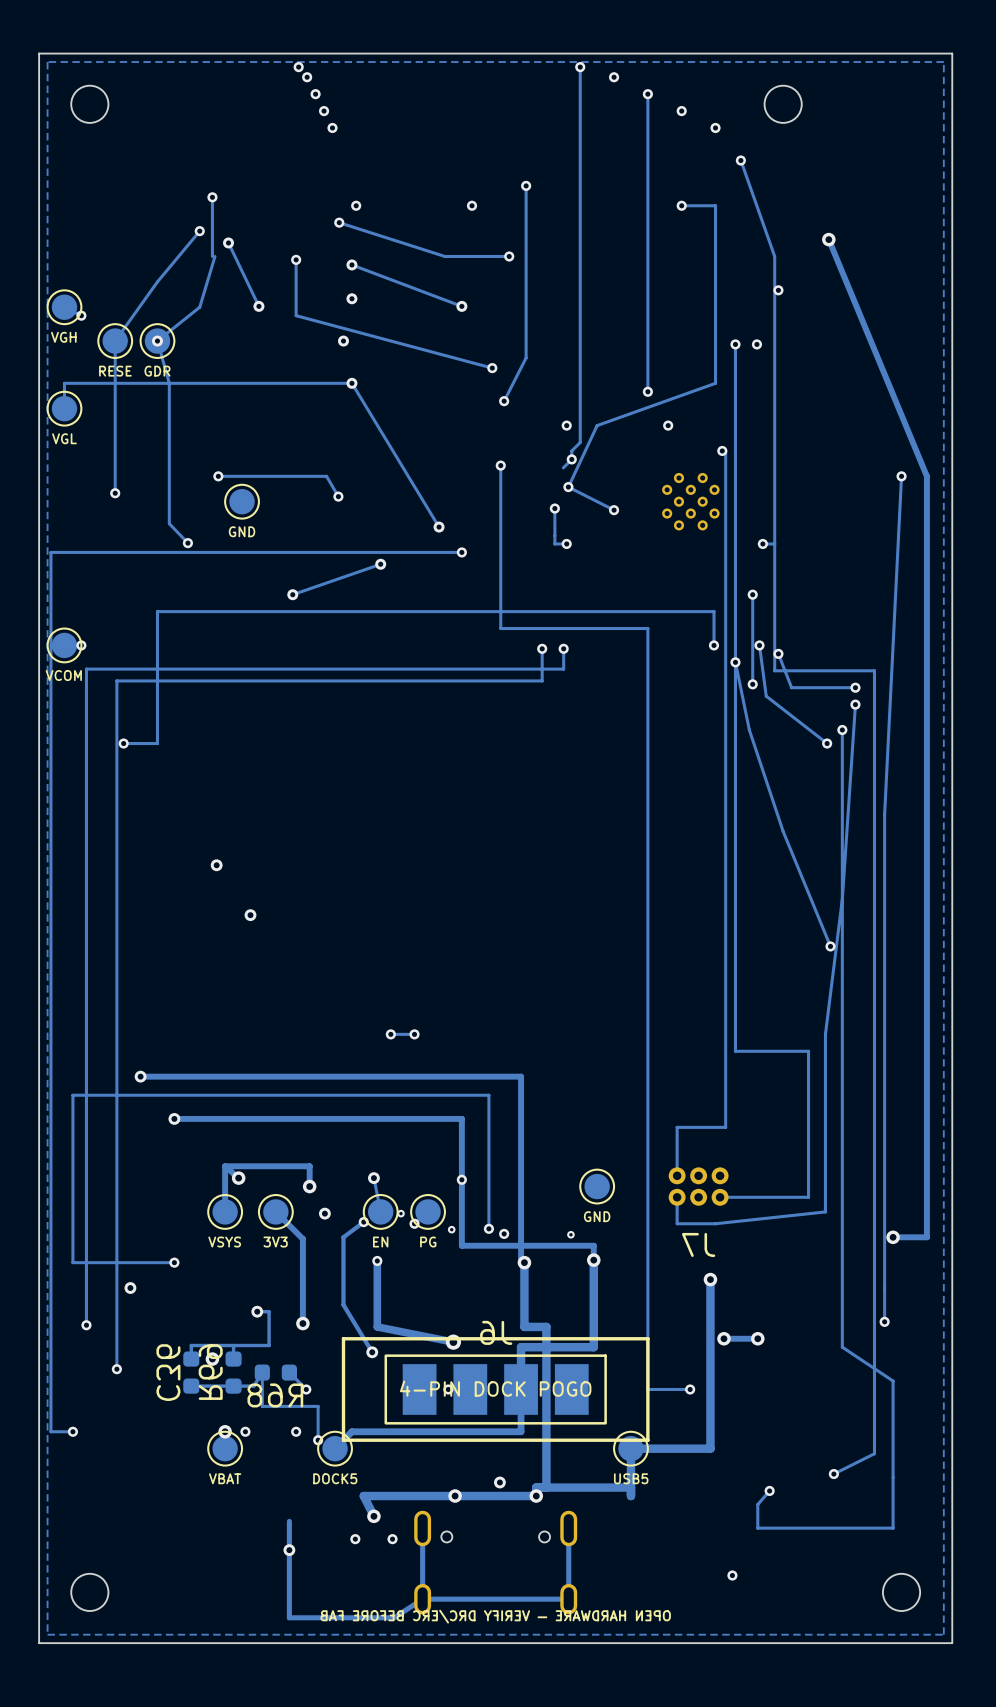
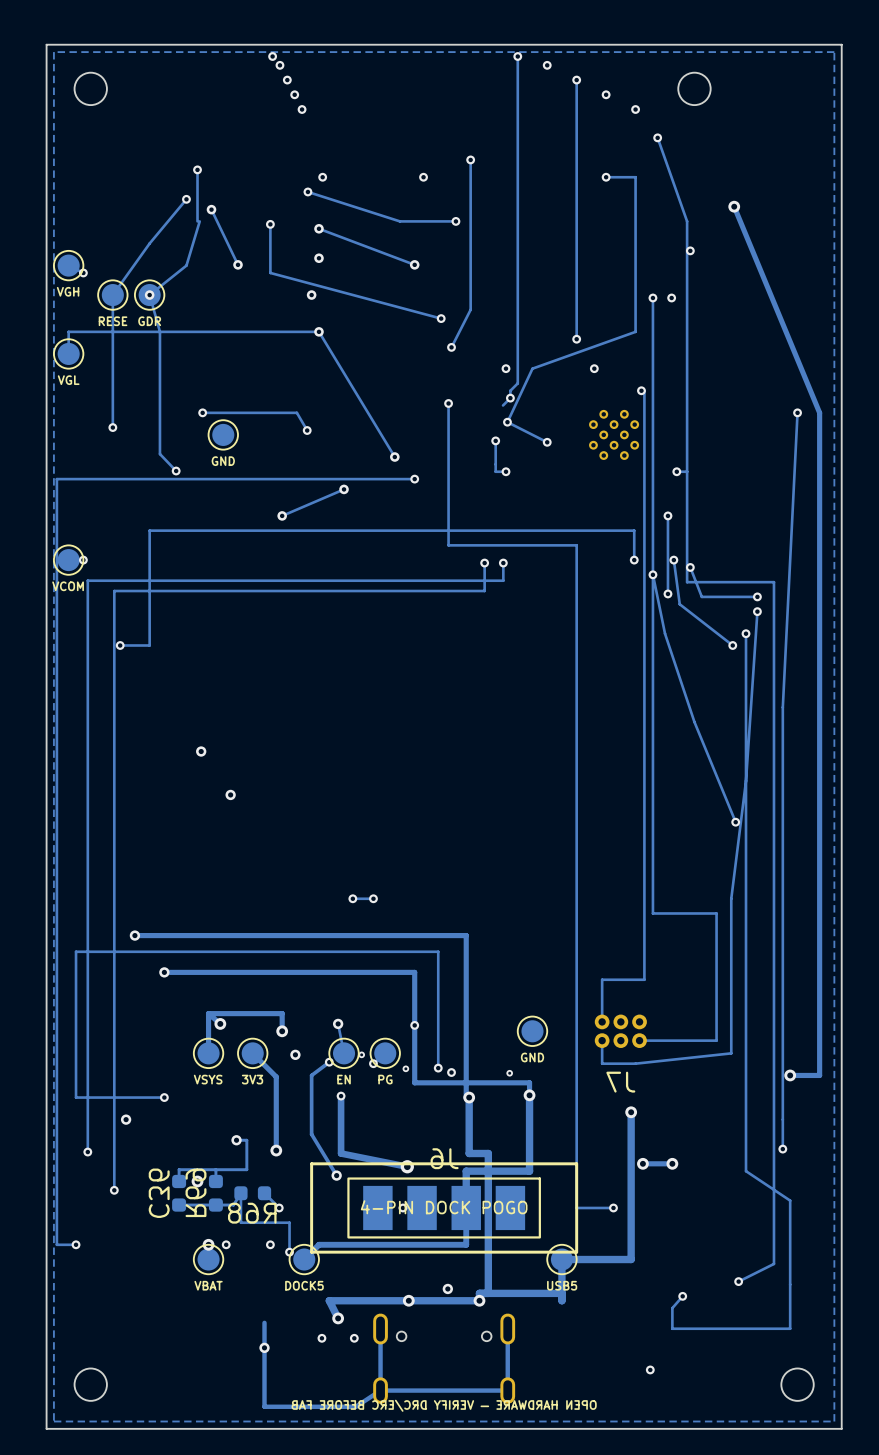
track: (380, 564) (292, 594) -> (344, 489) (282, 515)
via position: (292, 594) -> (282, 515)

